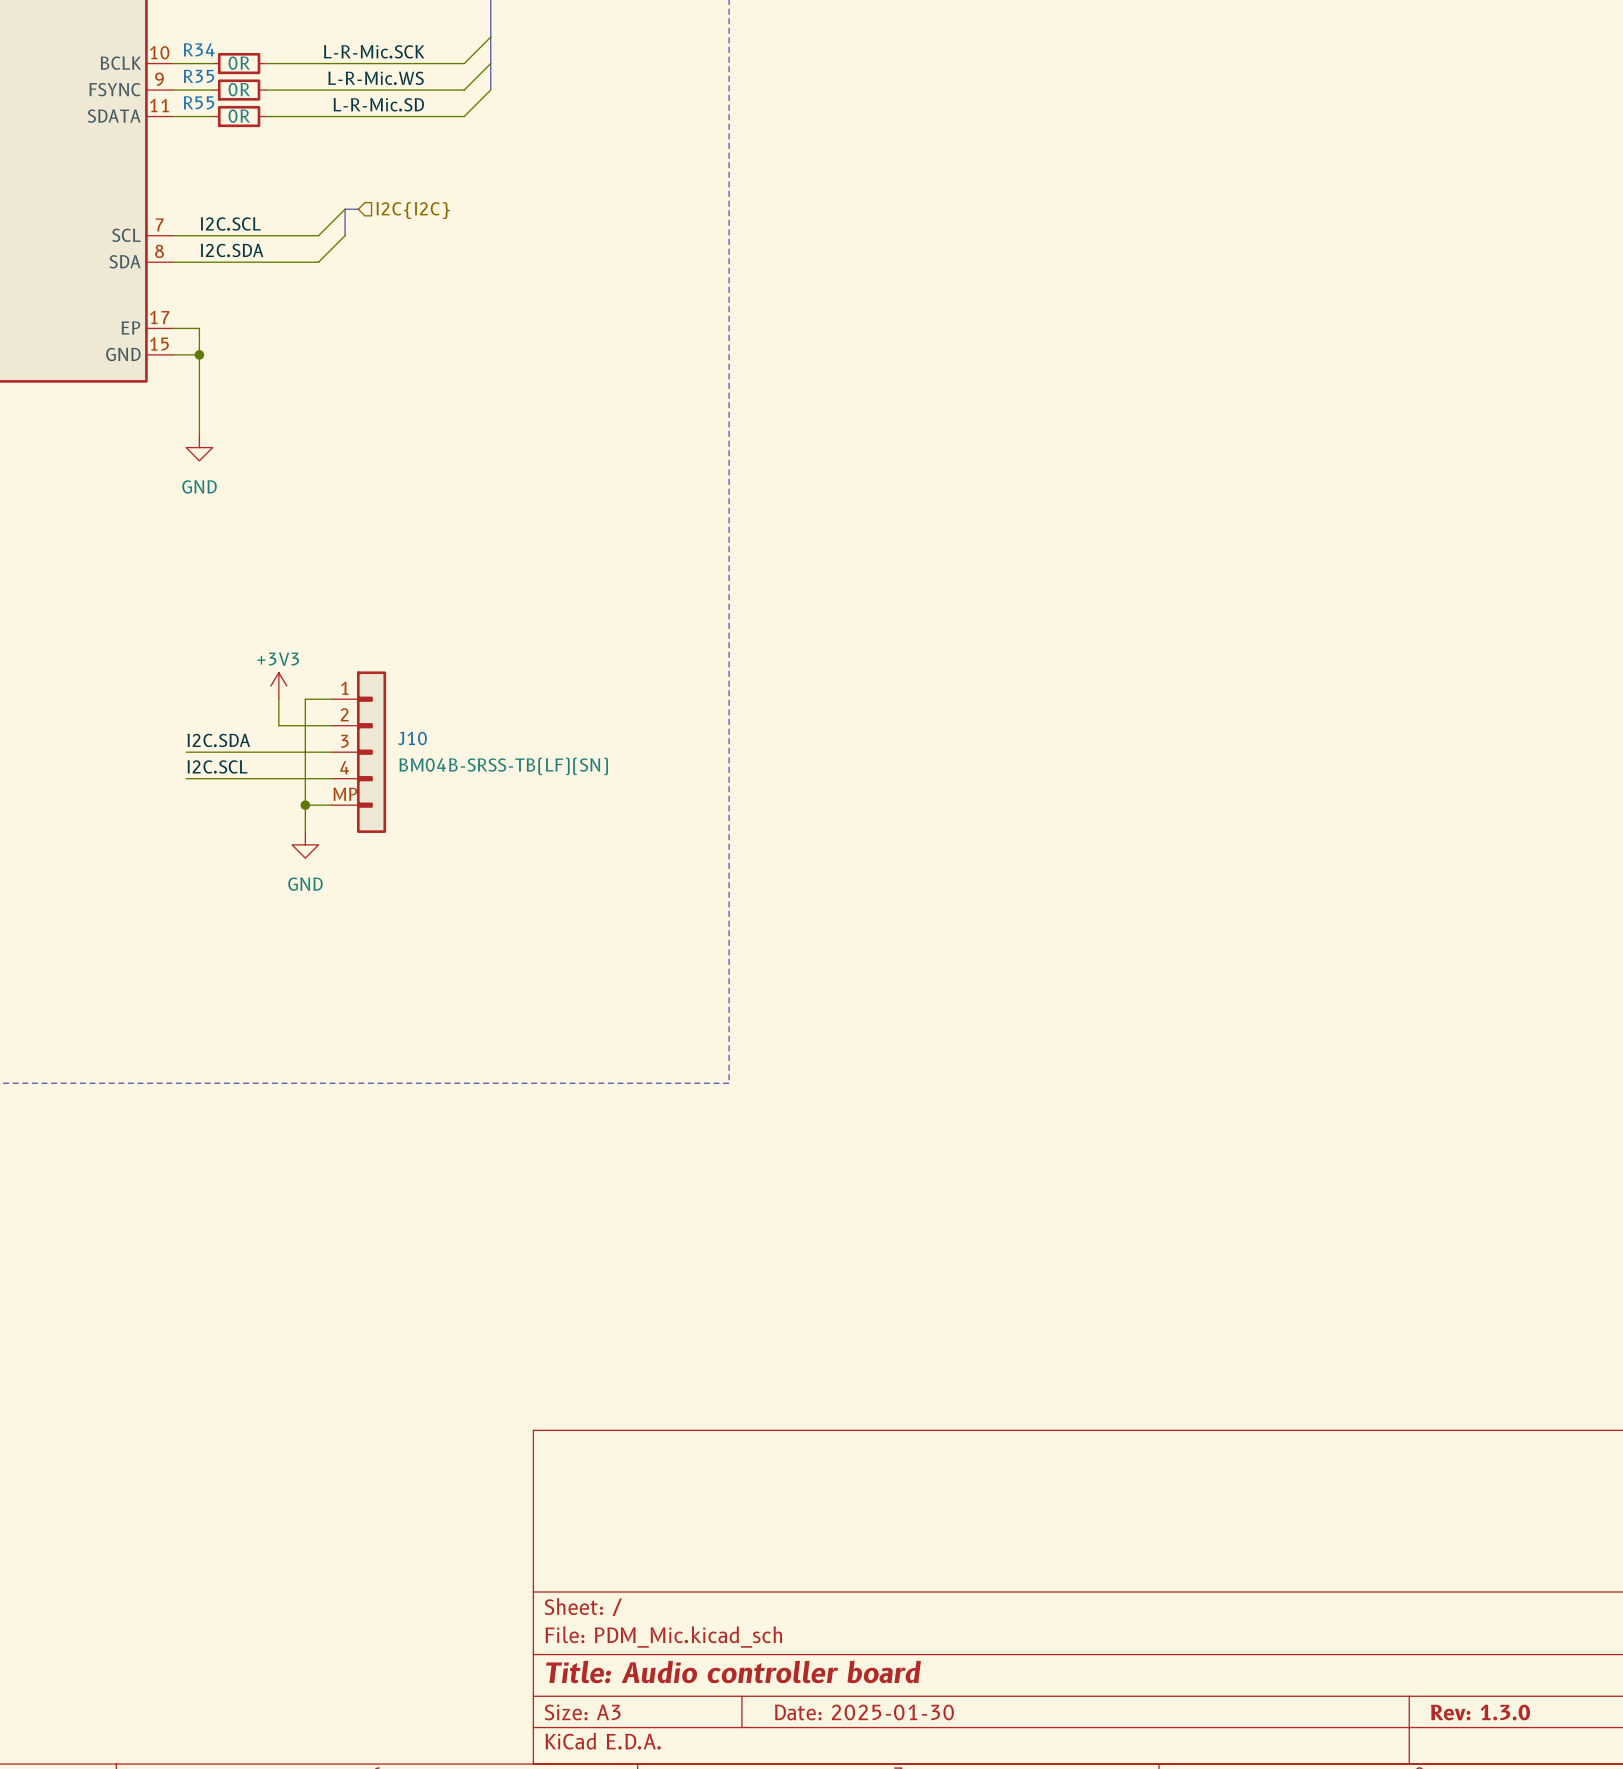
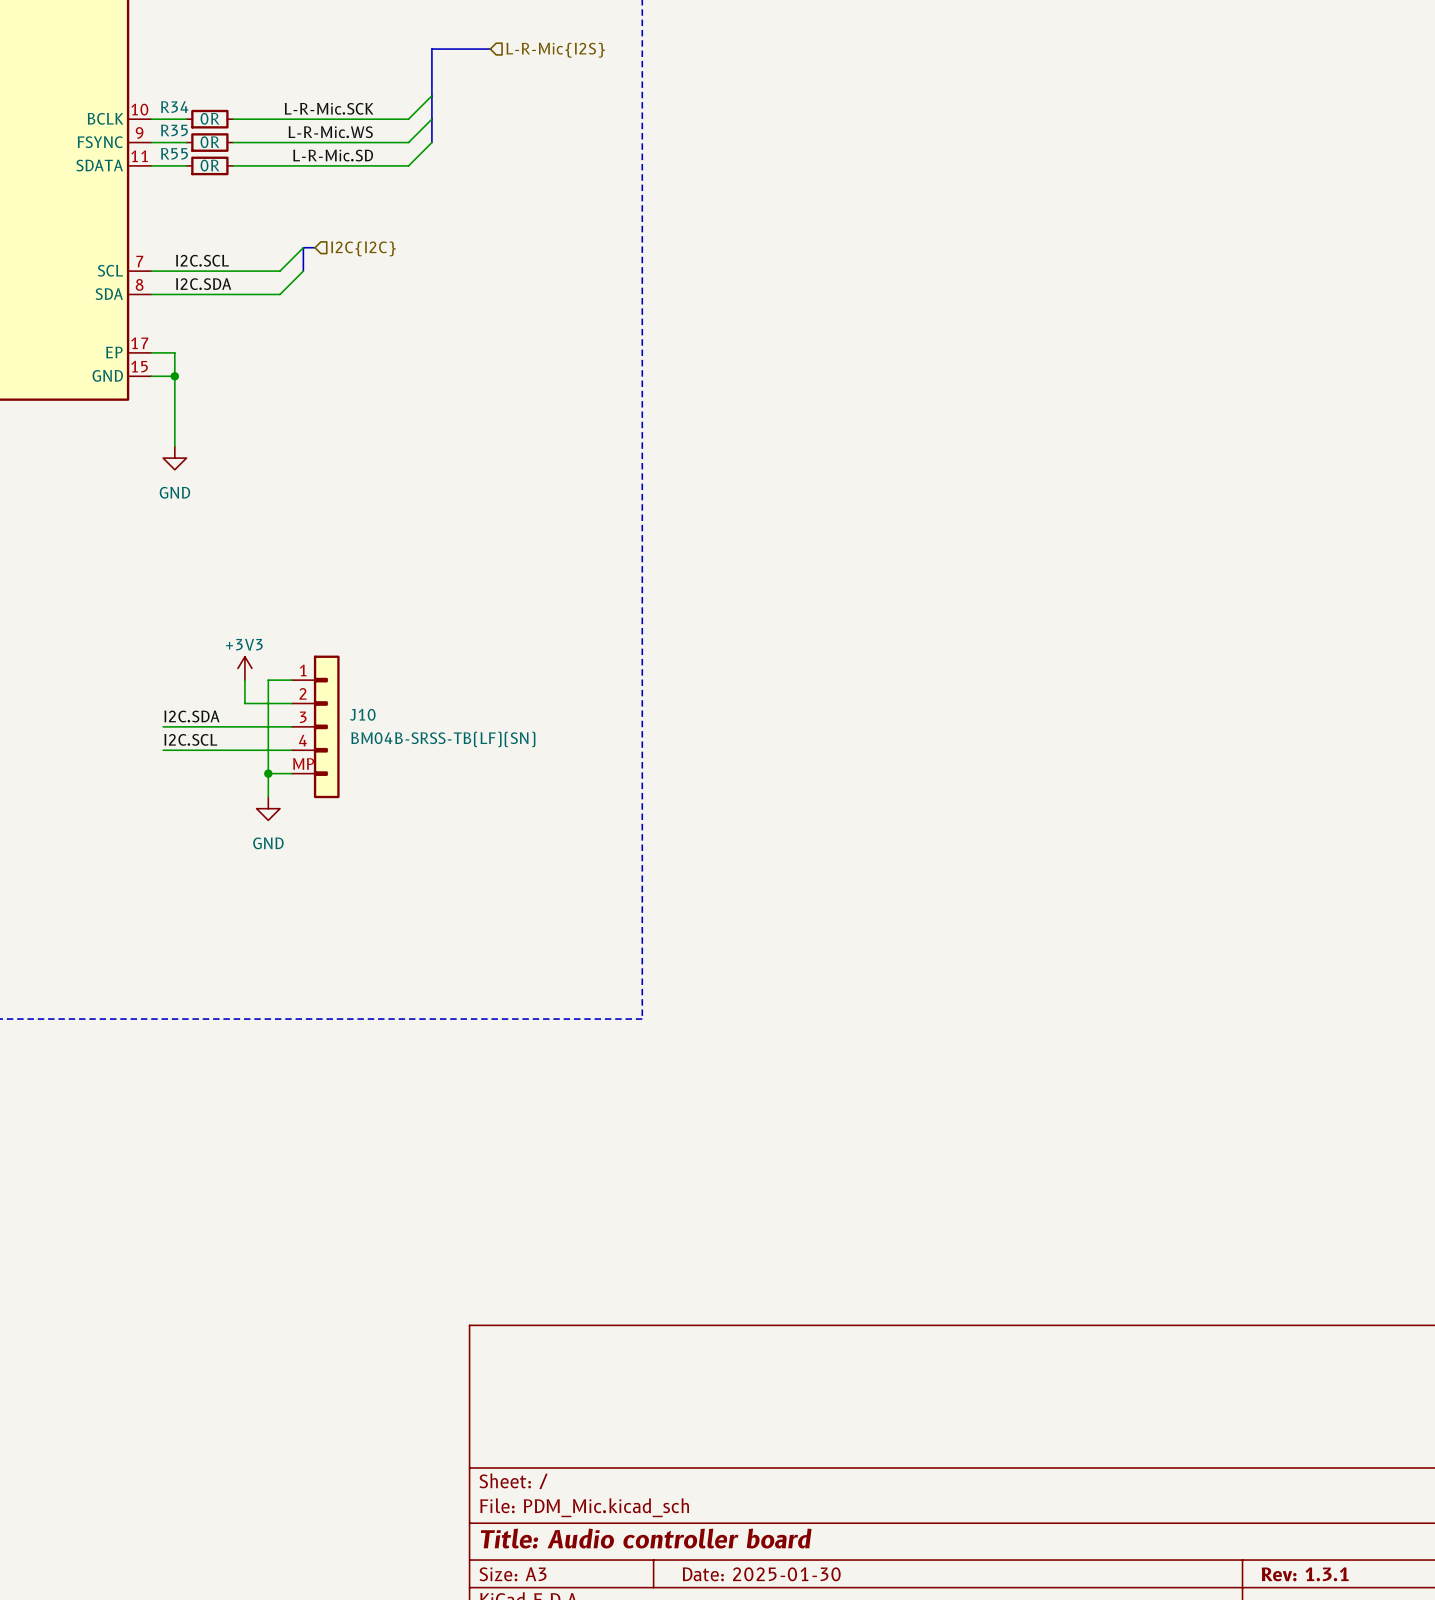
title block: Rev: 1.3.0 (1480, 1712) -> Rev: 1.3.1 (1305, 1574)

